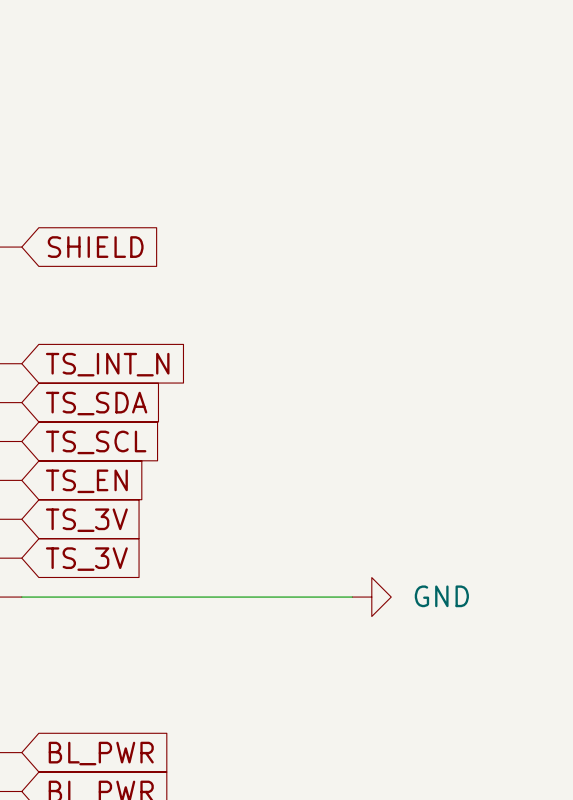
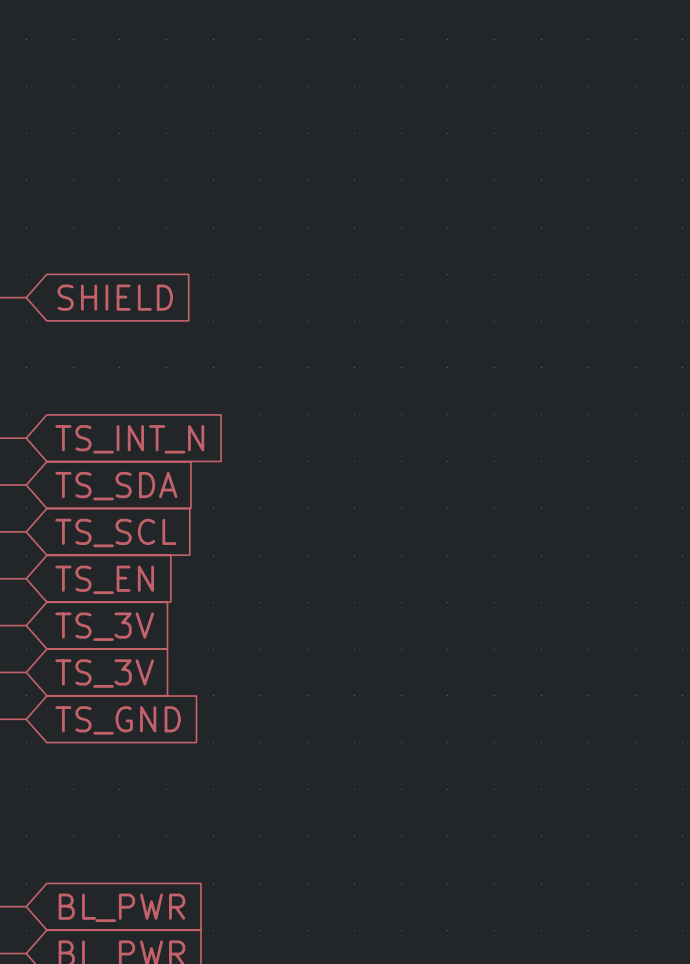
wire: (21, 597) (352, 597) -> none
global label: none -> TS_GND (118, 720)
power symbol: GND (371, 597) -> none

